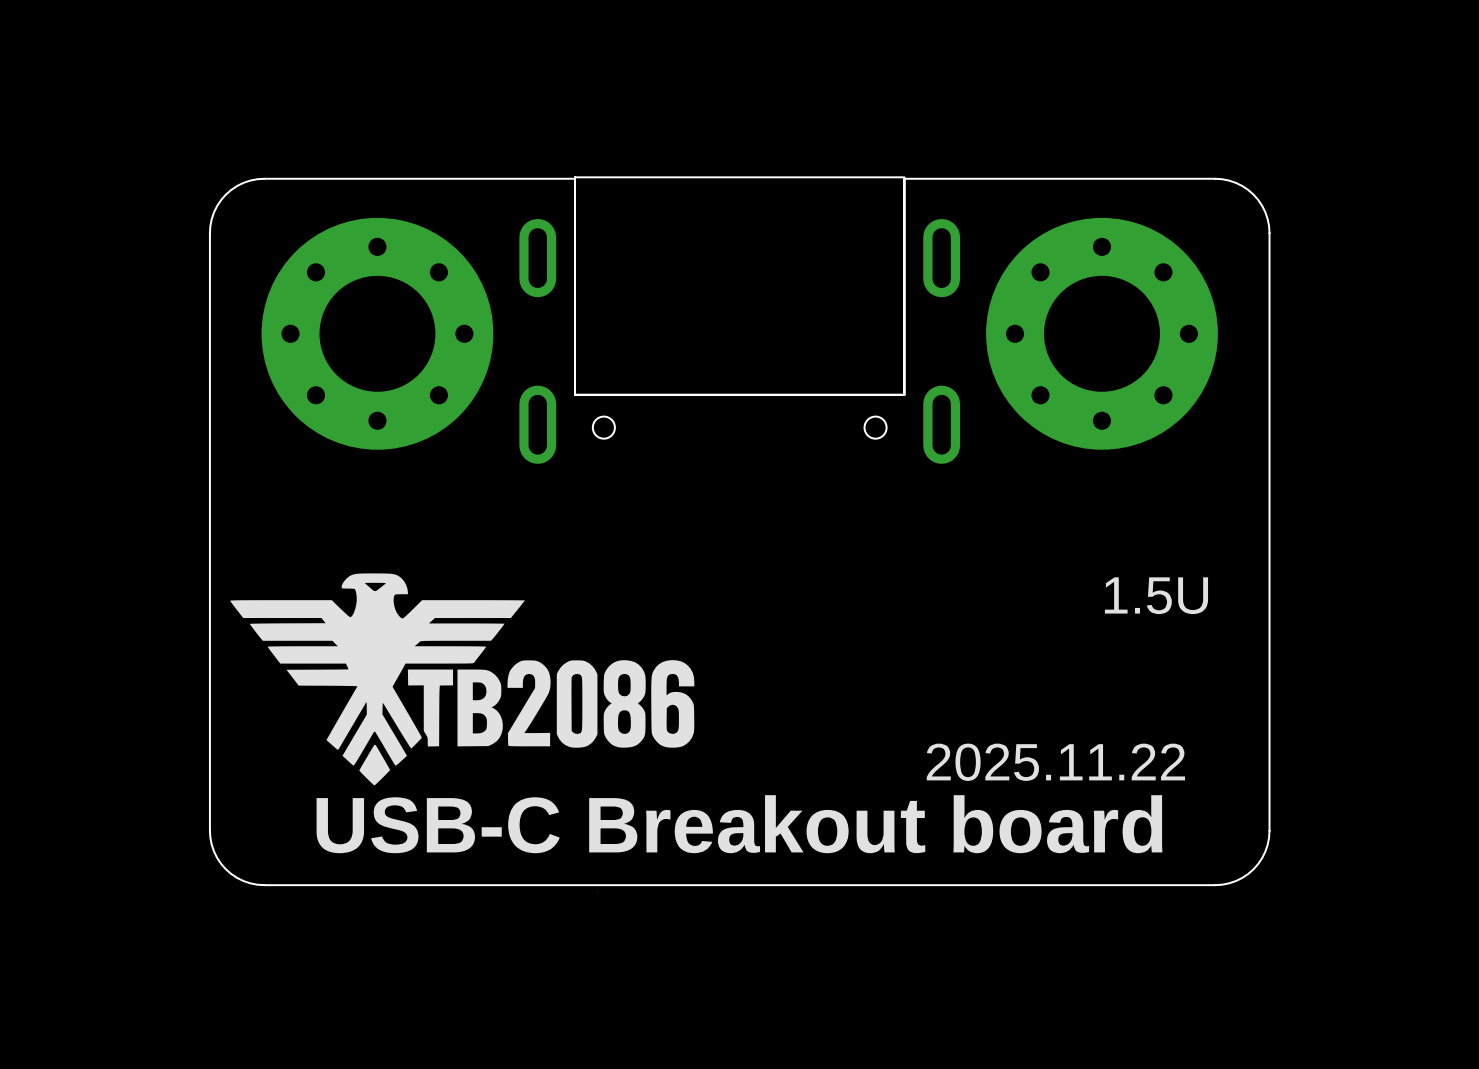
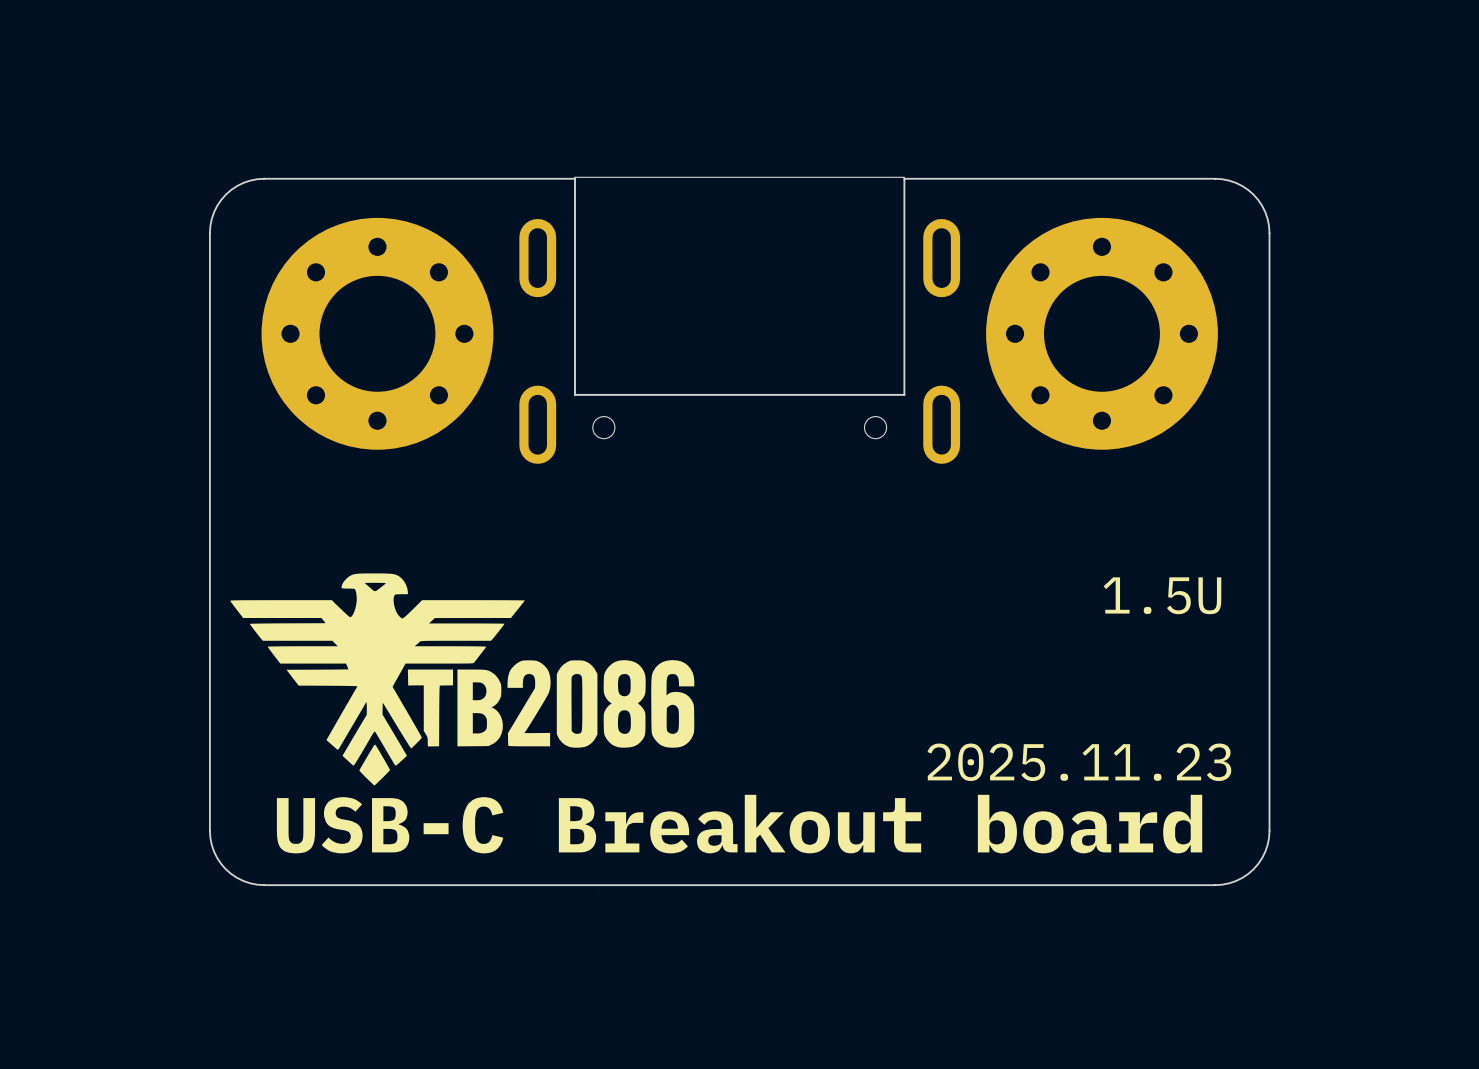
text: 2025.11.22 (1055, 762) -> 2025.11.23 (1079, 762)

